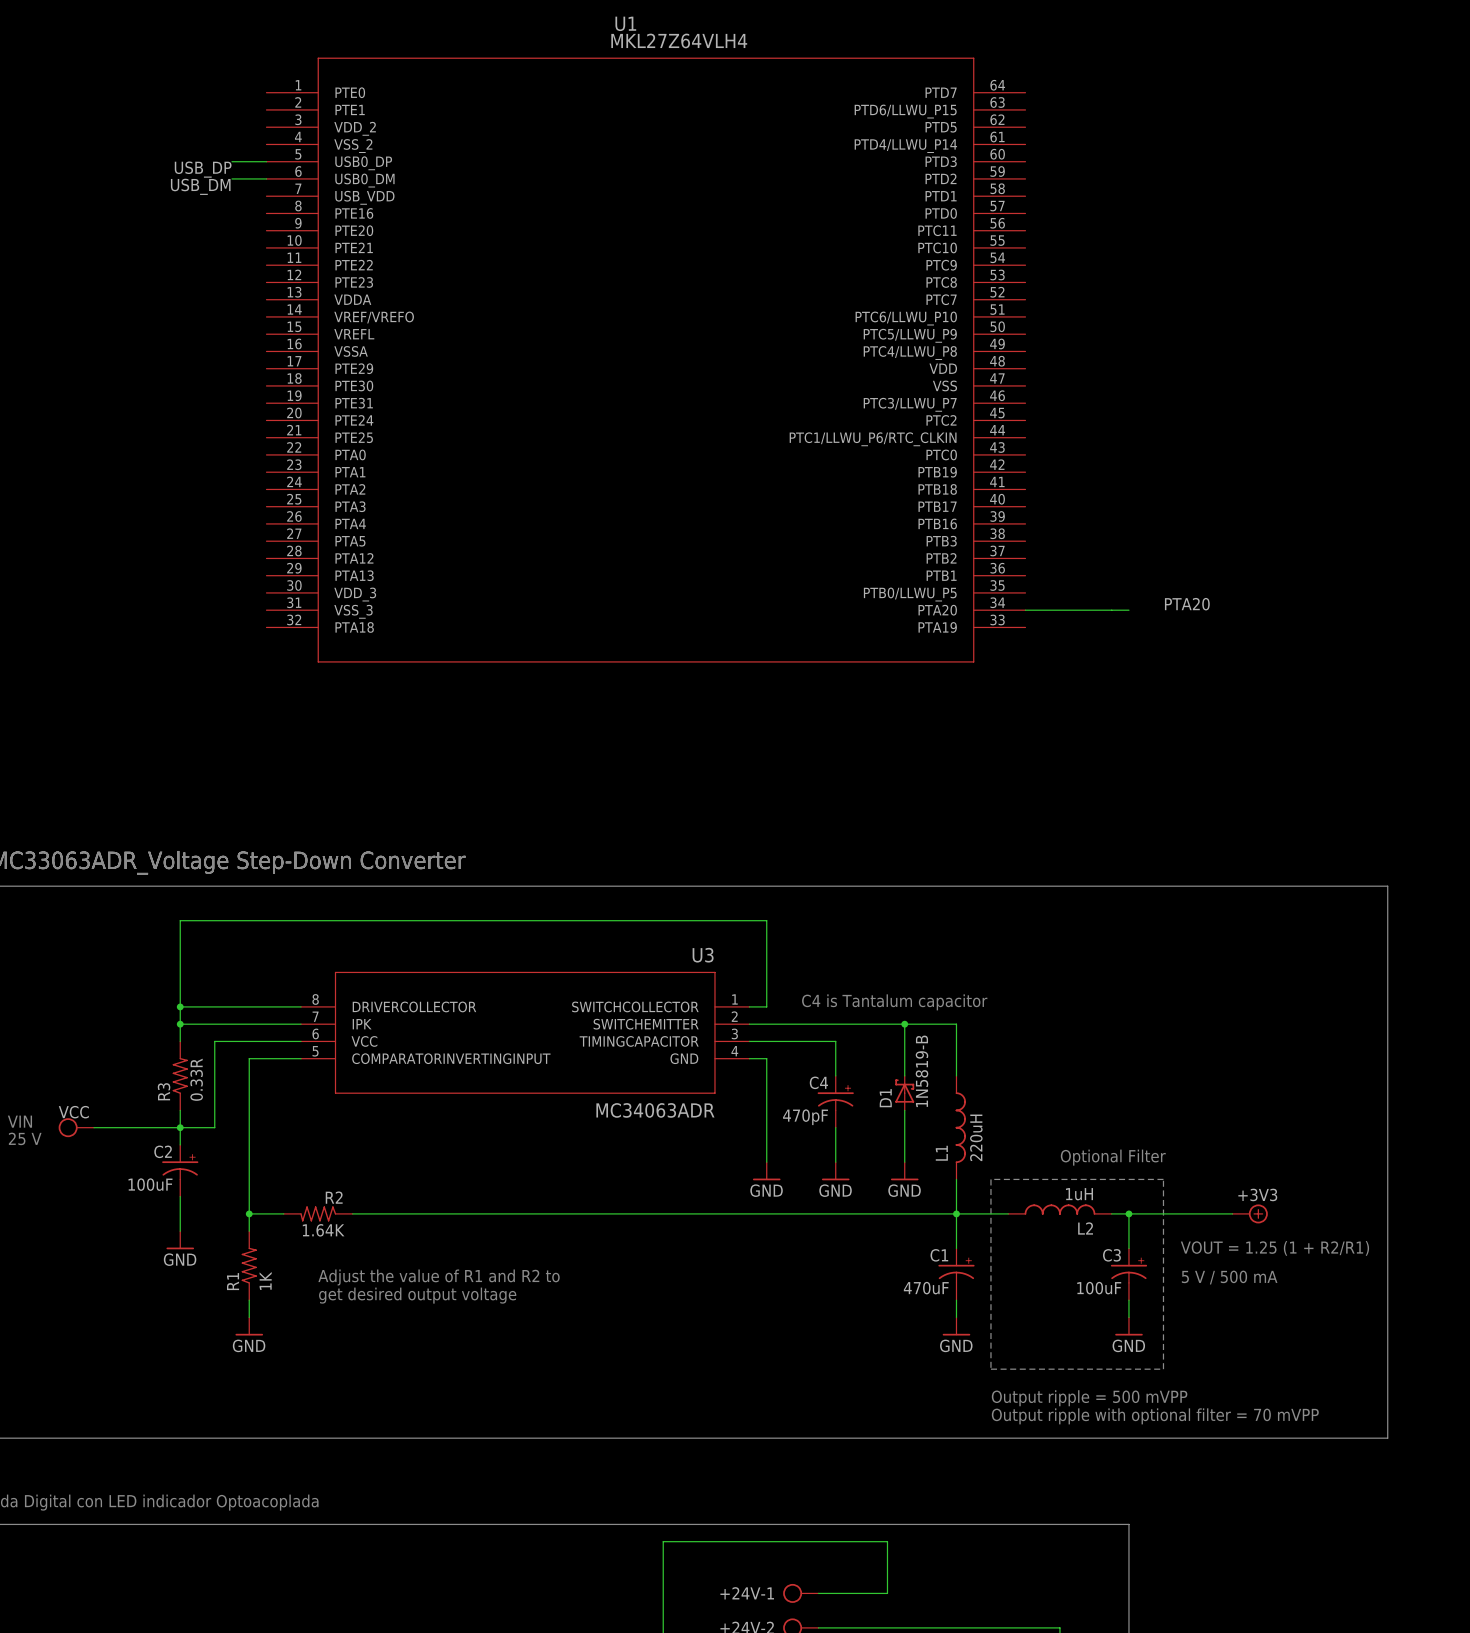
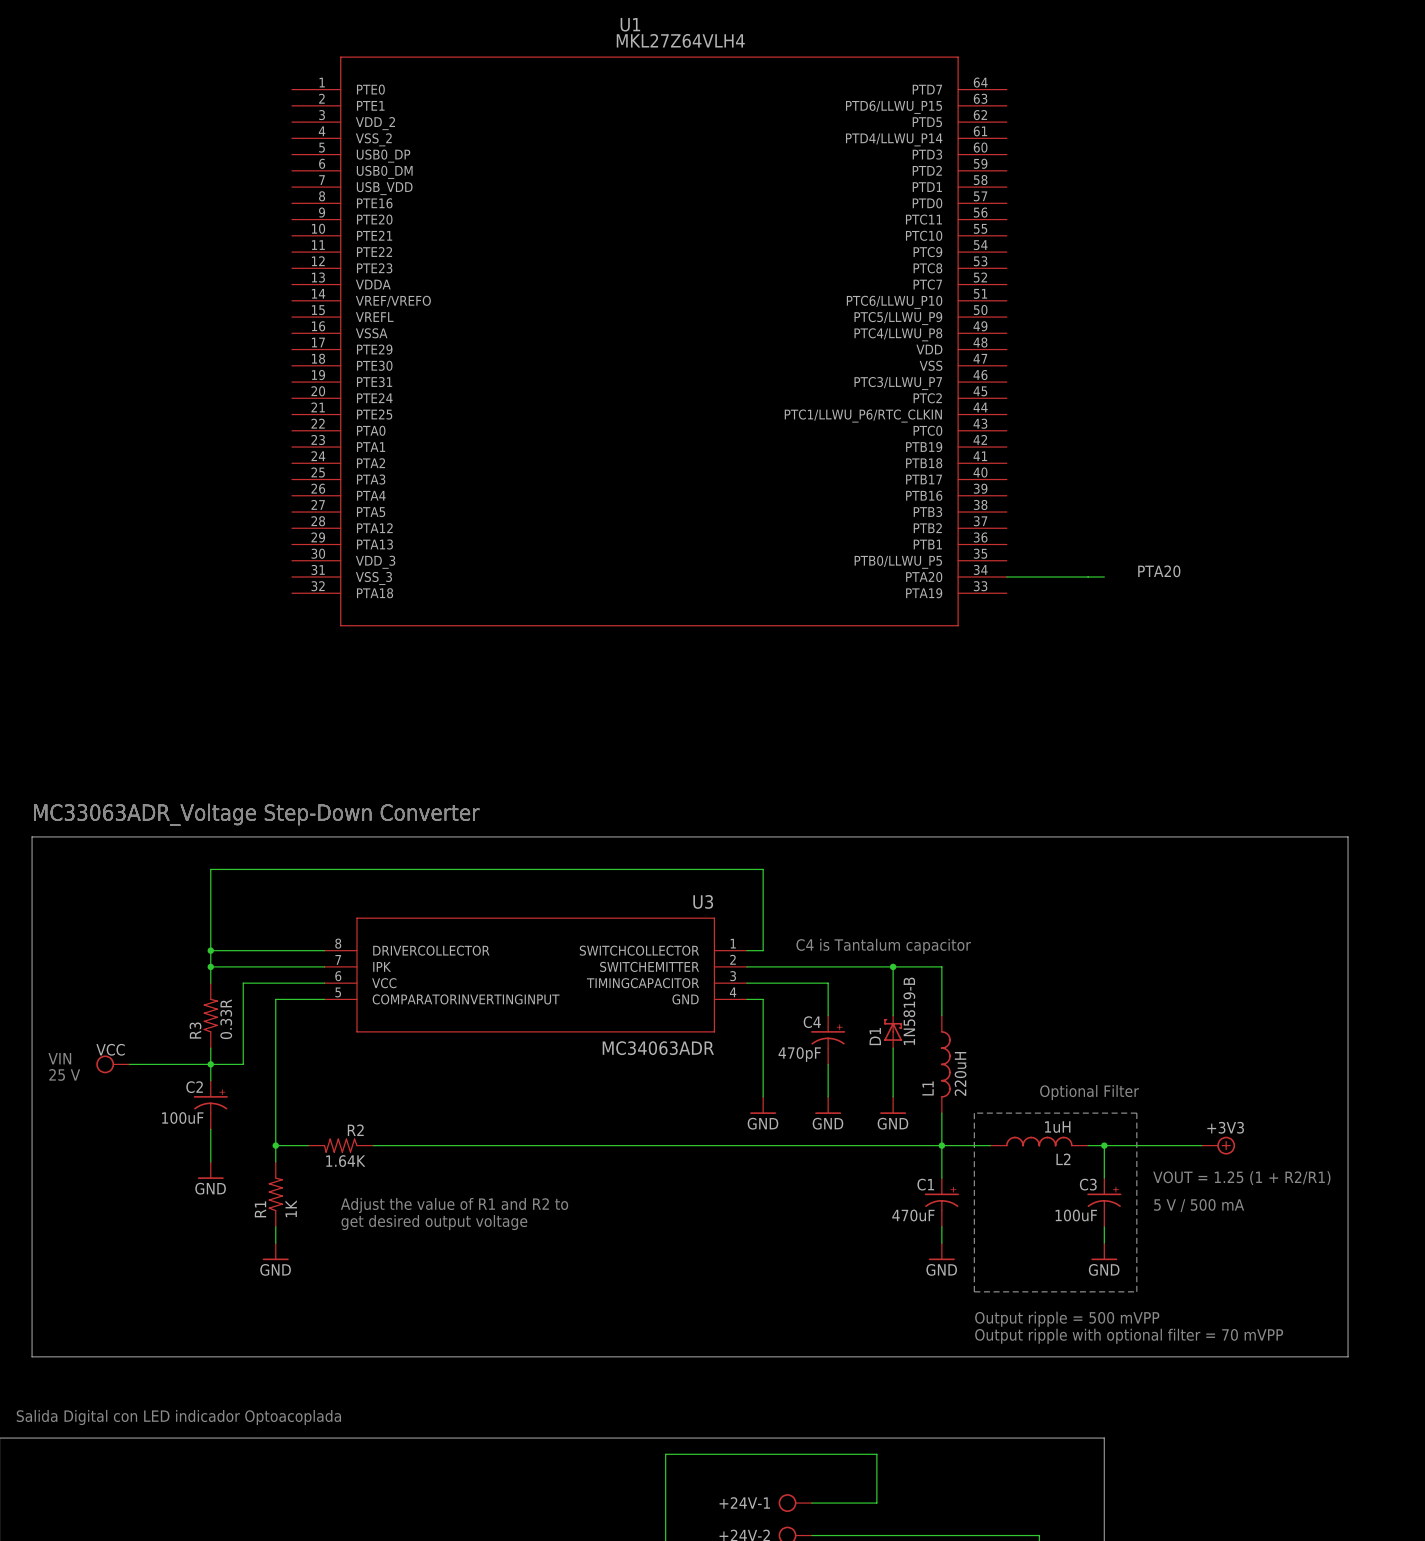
wire: (232, 161) (266, 161) -> none
label: USB_DP (203, 169) -> none
wire: (232, 178) (266, 178) -> none
label: USB_DM (200, 186) -> none

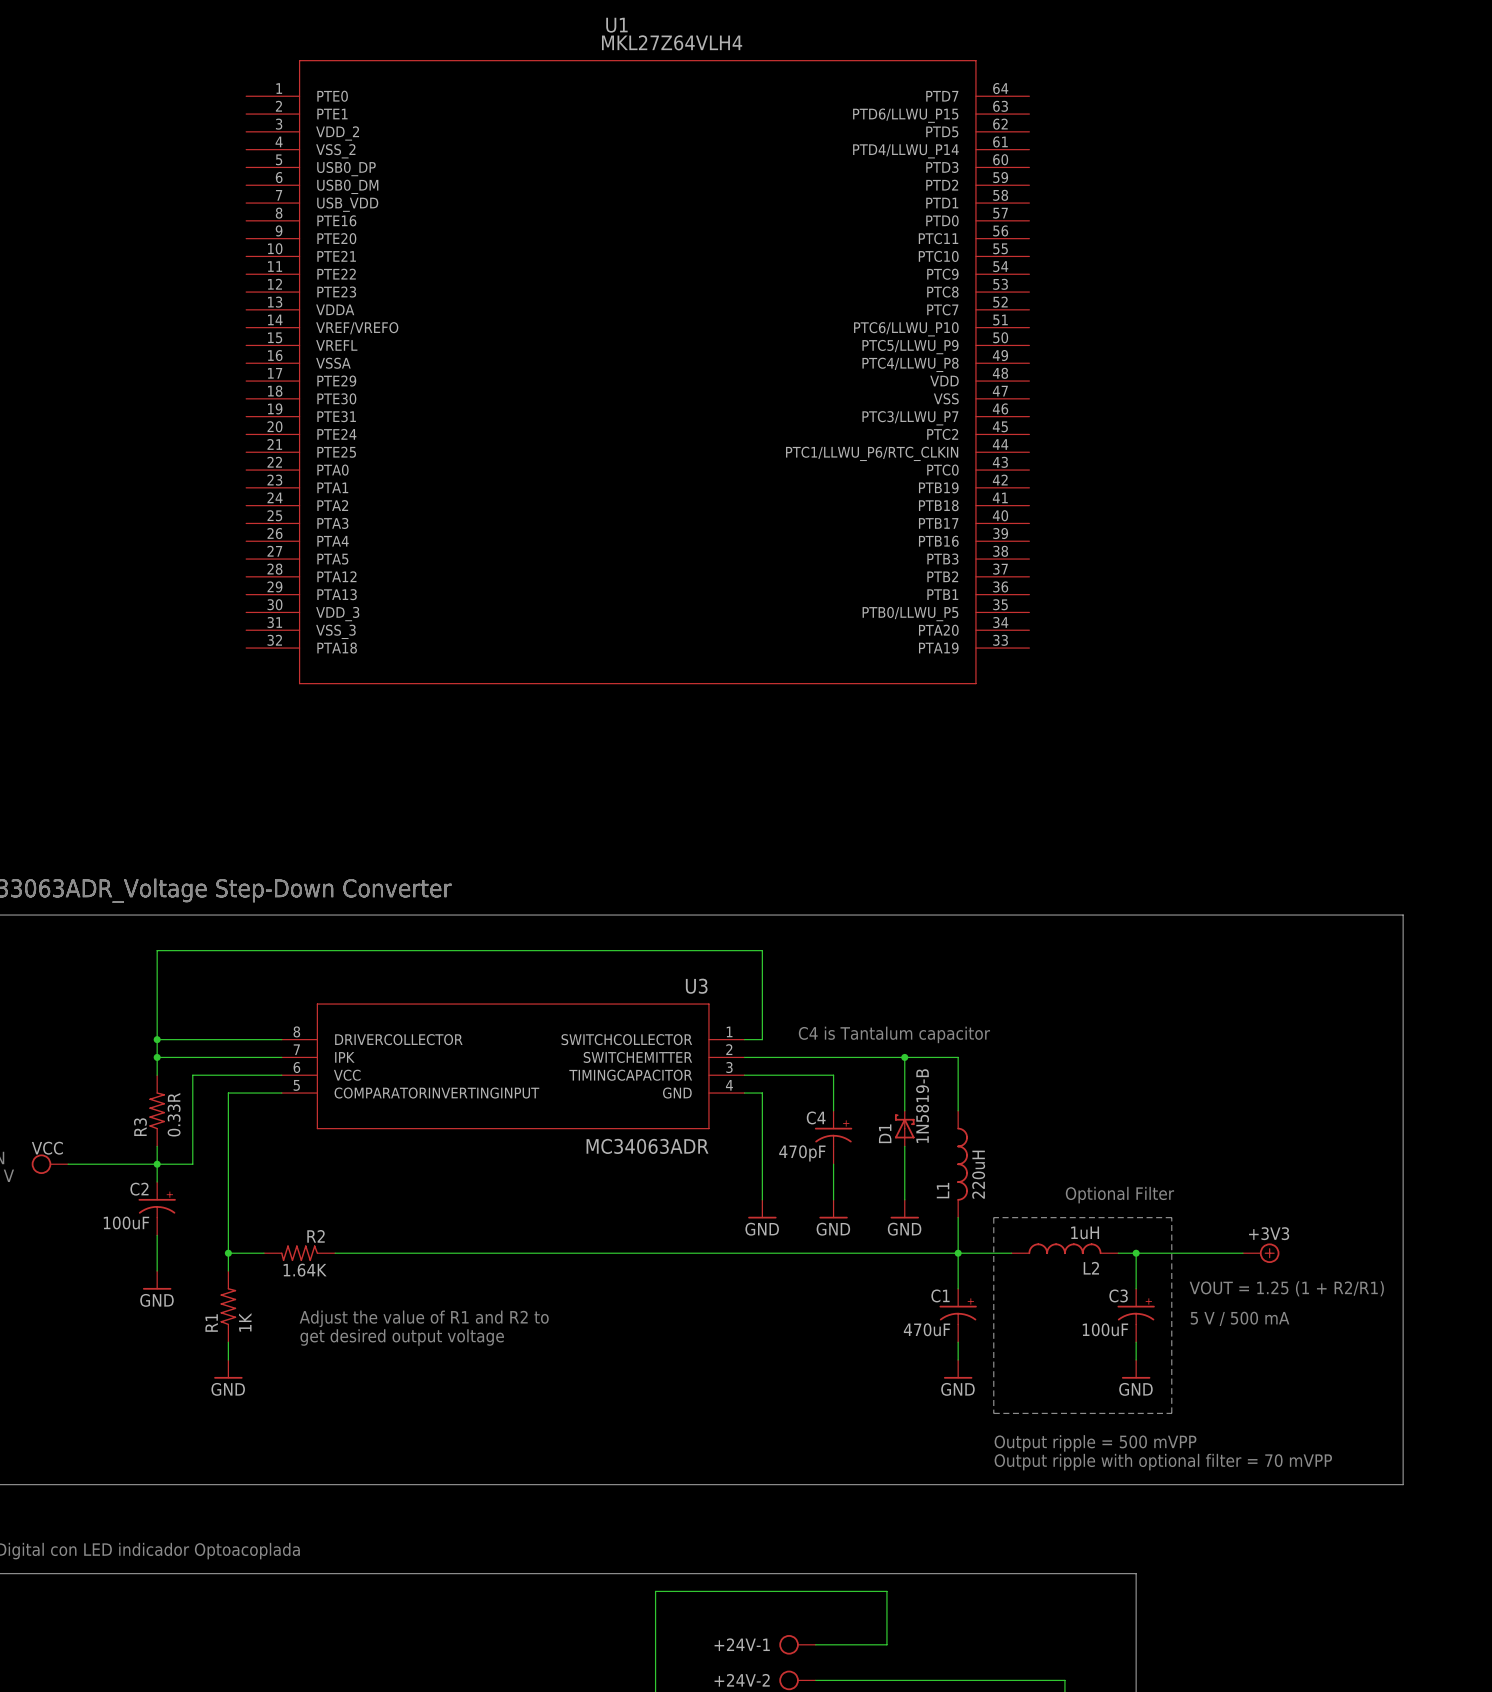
label: PTA20 (1159, 571) -> none
wire: (1006, 577) (1104, 577) -> none

